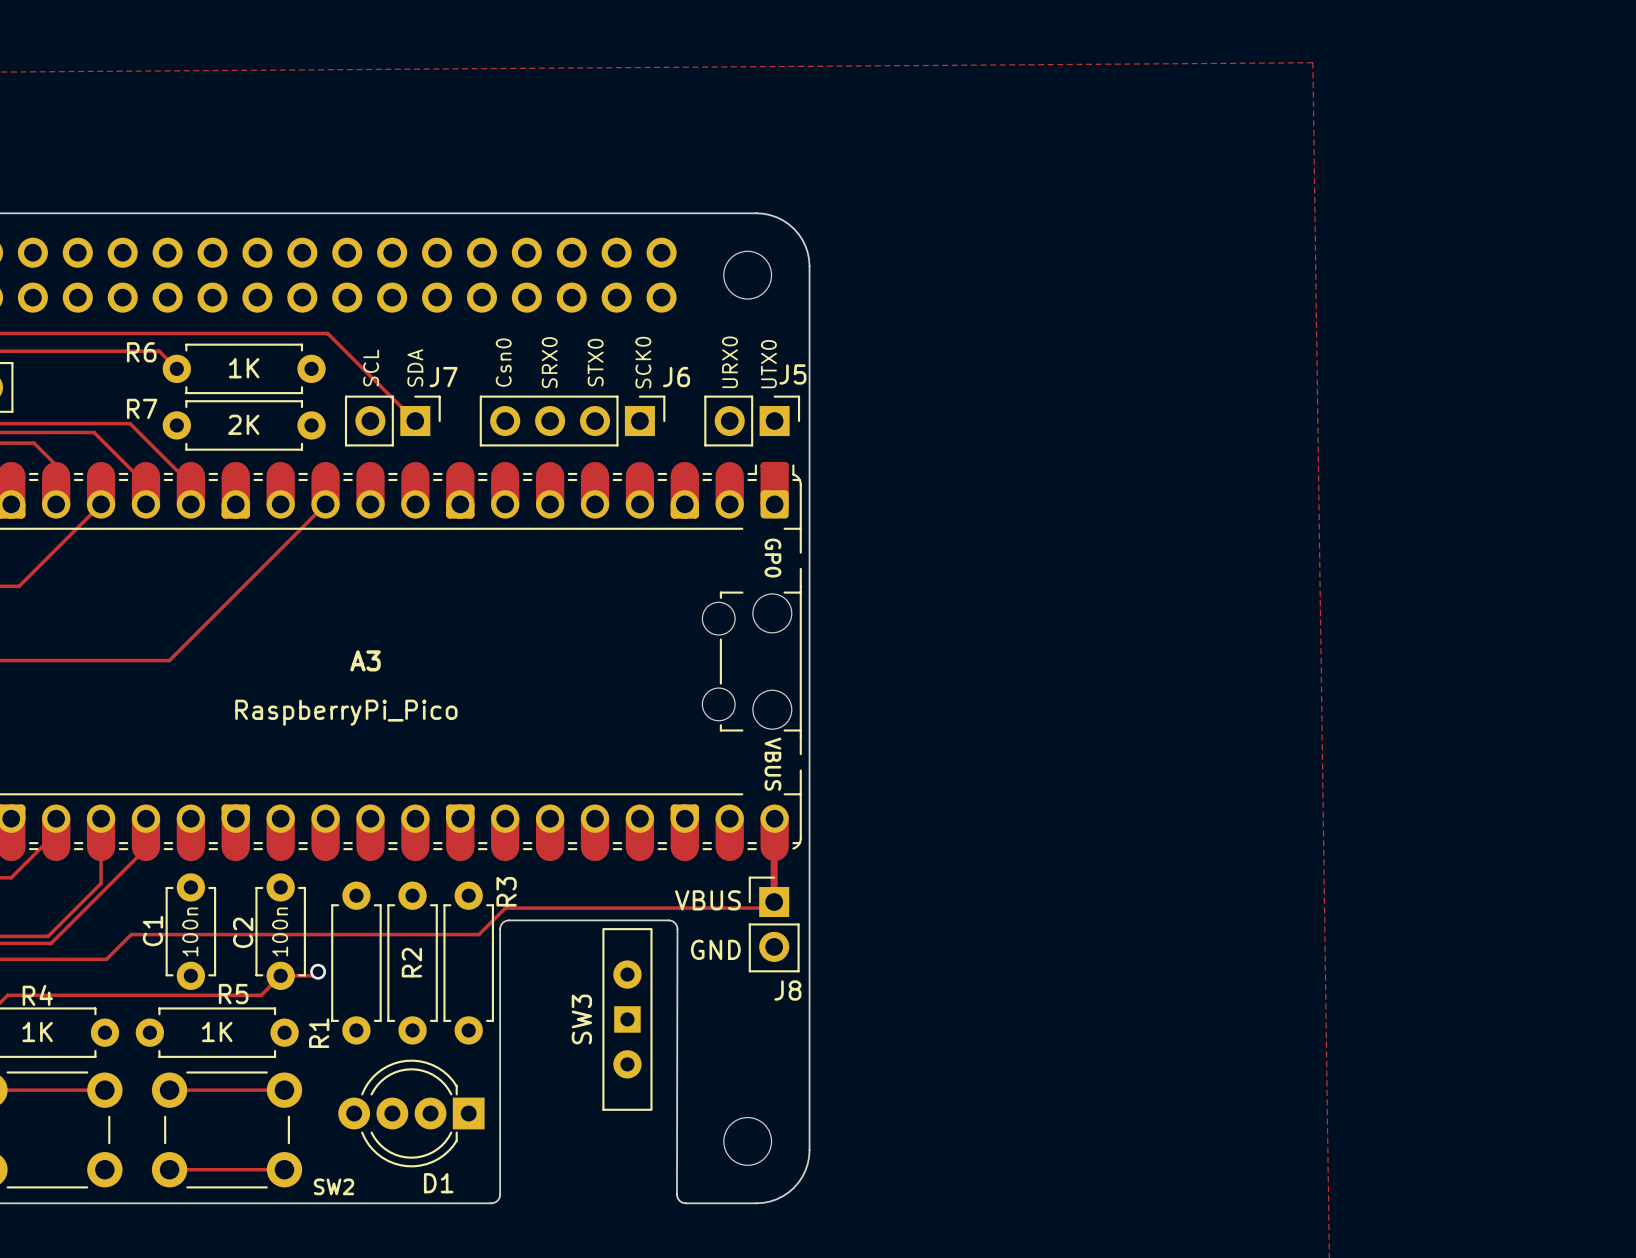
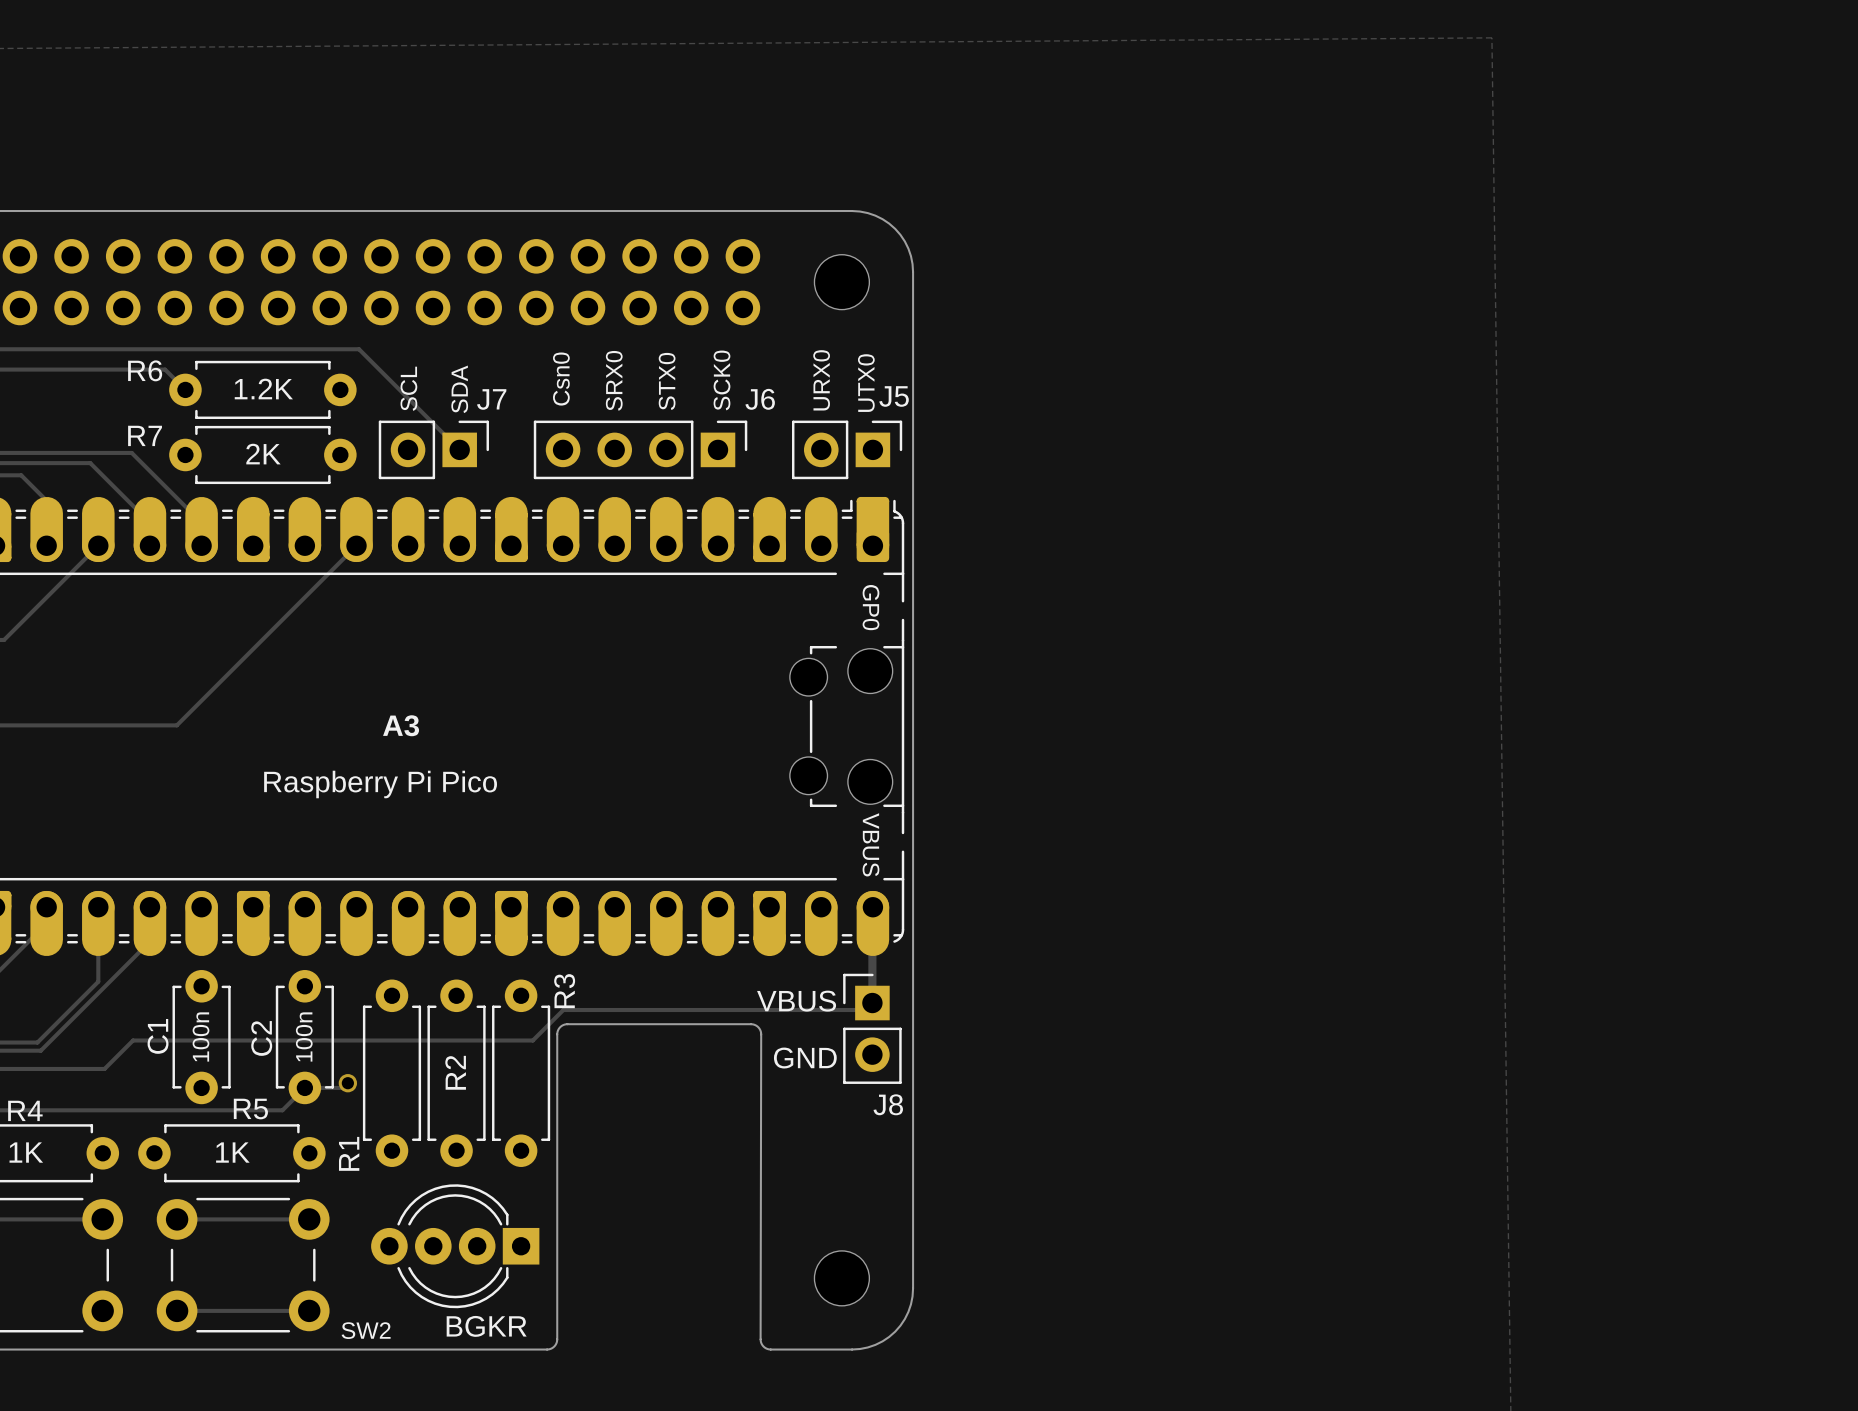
R6 value: 1K (244, 368) -> 1.2K (263, 389)
A3 value: RaspberryPi_Pico (346, 712) -> Raspberry Pi Pico (380, 784)
SW3: (627, 1019) -> none
D1 name: D1 (438, 1183) -> BGKR (486, 1326)

